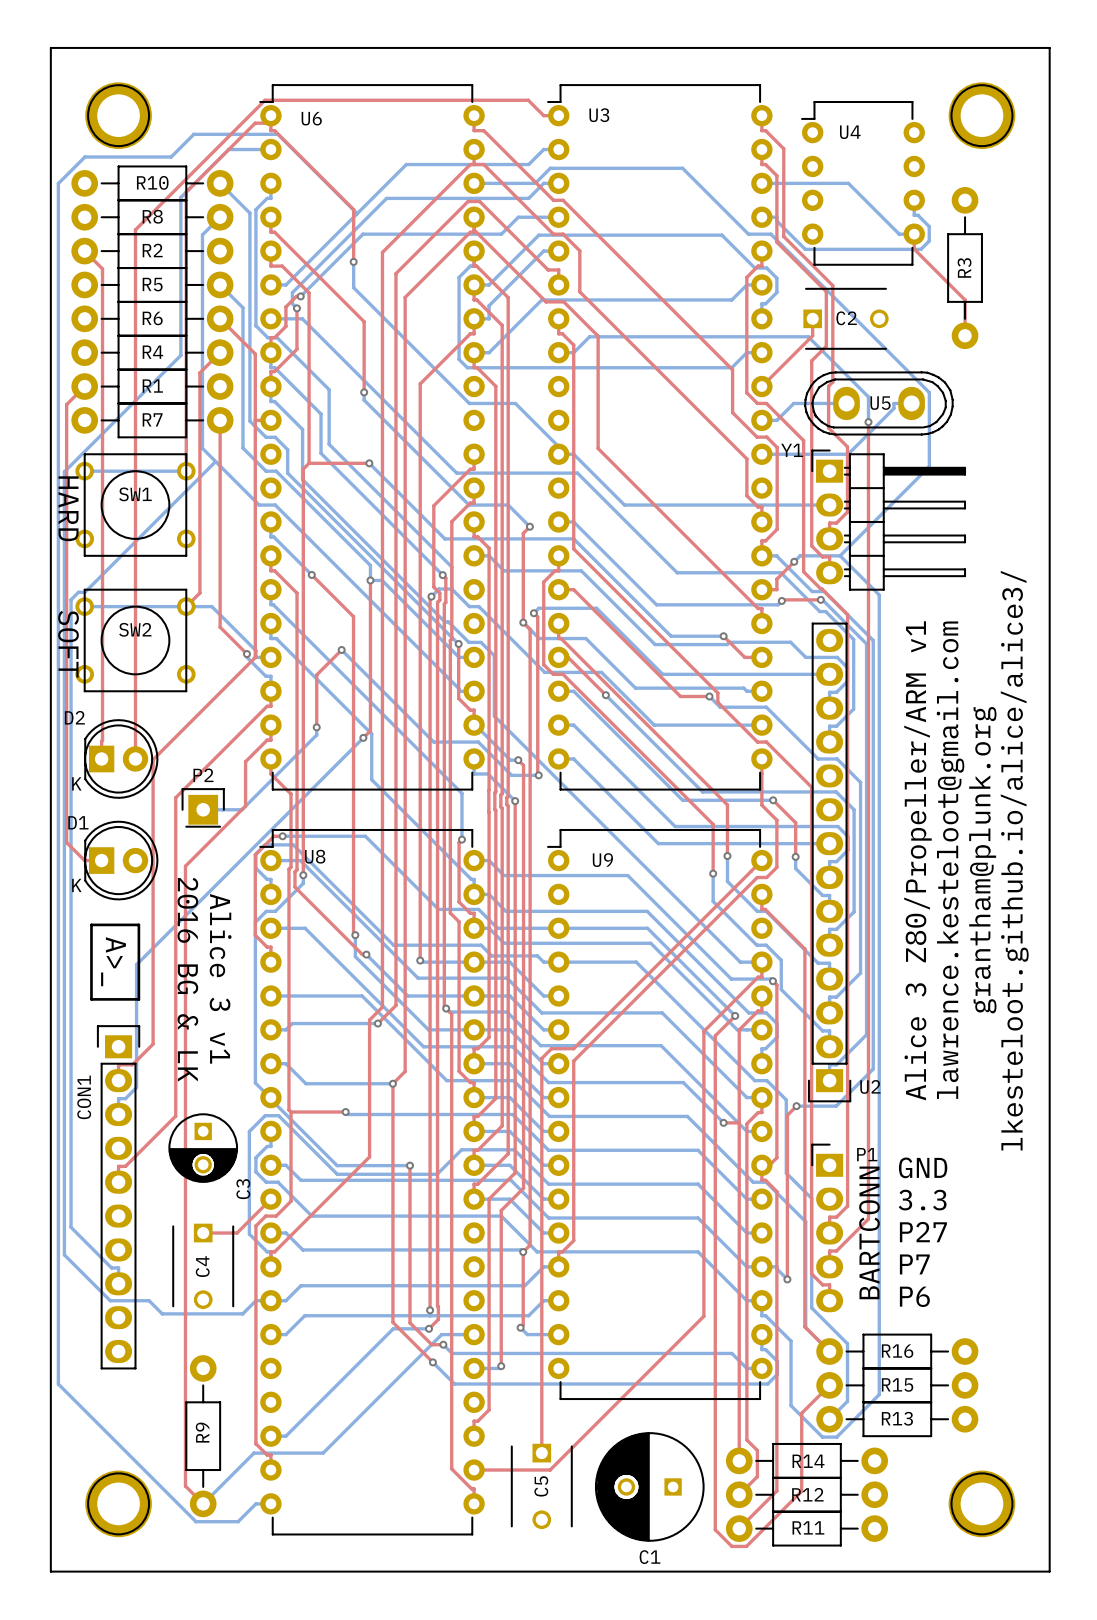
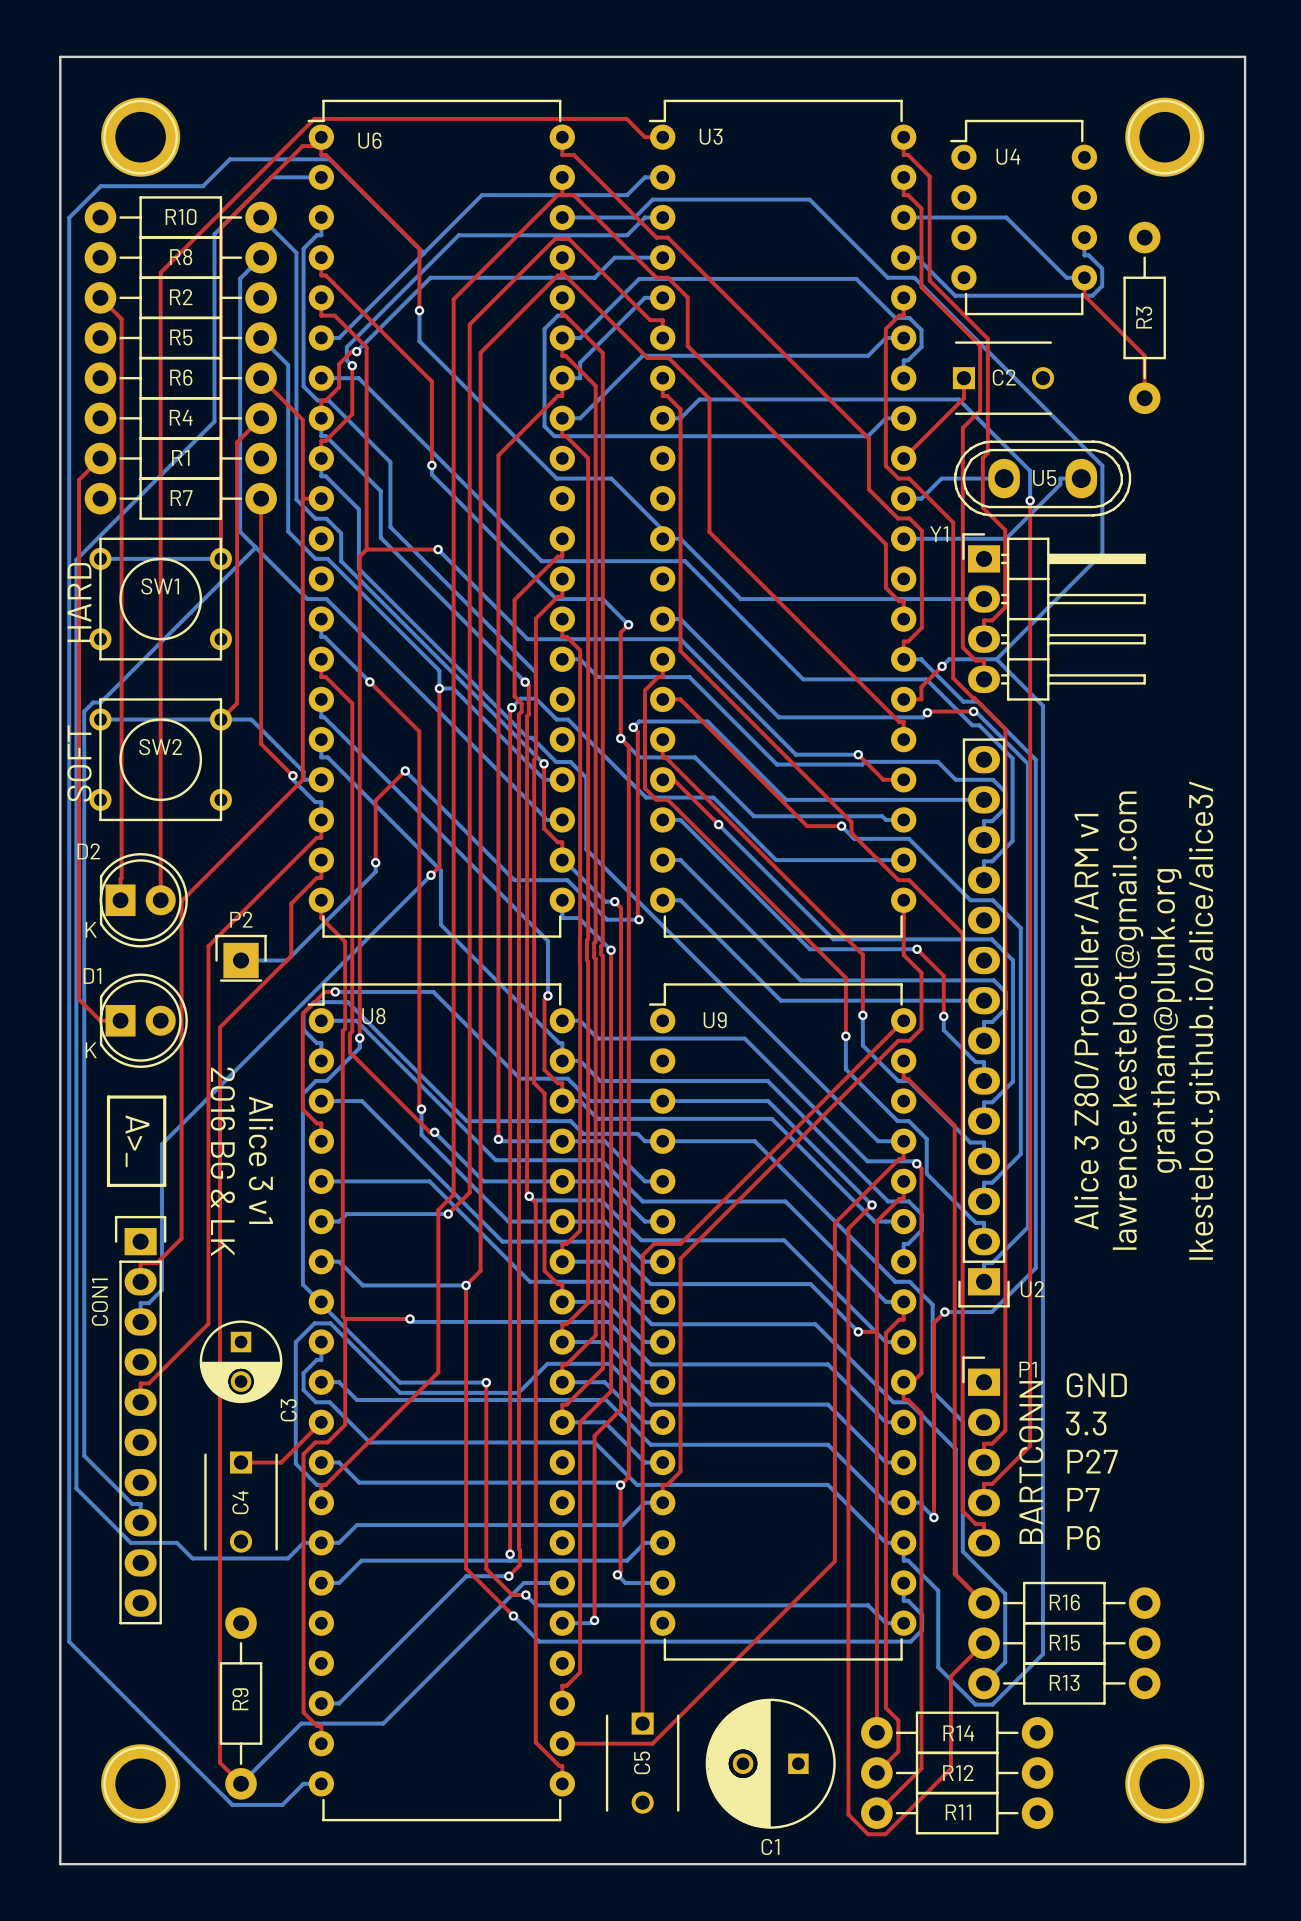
text rotation: 0° (68, 508) -> 180° (79, 602)
text rotation: 0° (68, 644) -> 180° (79, 763)

